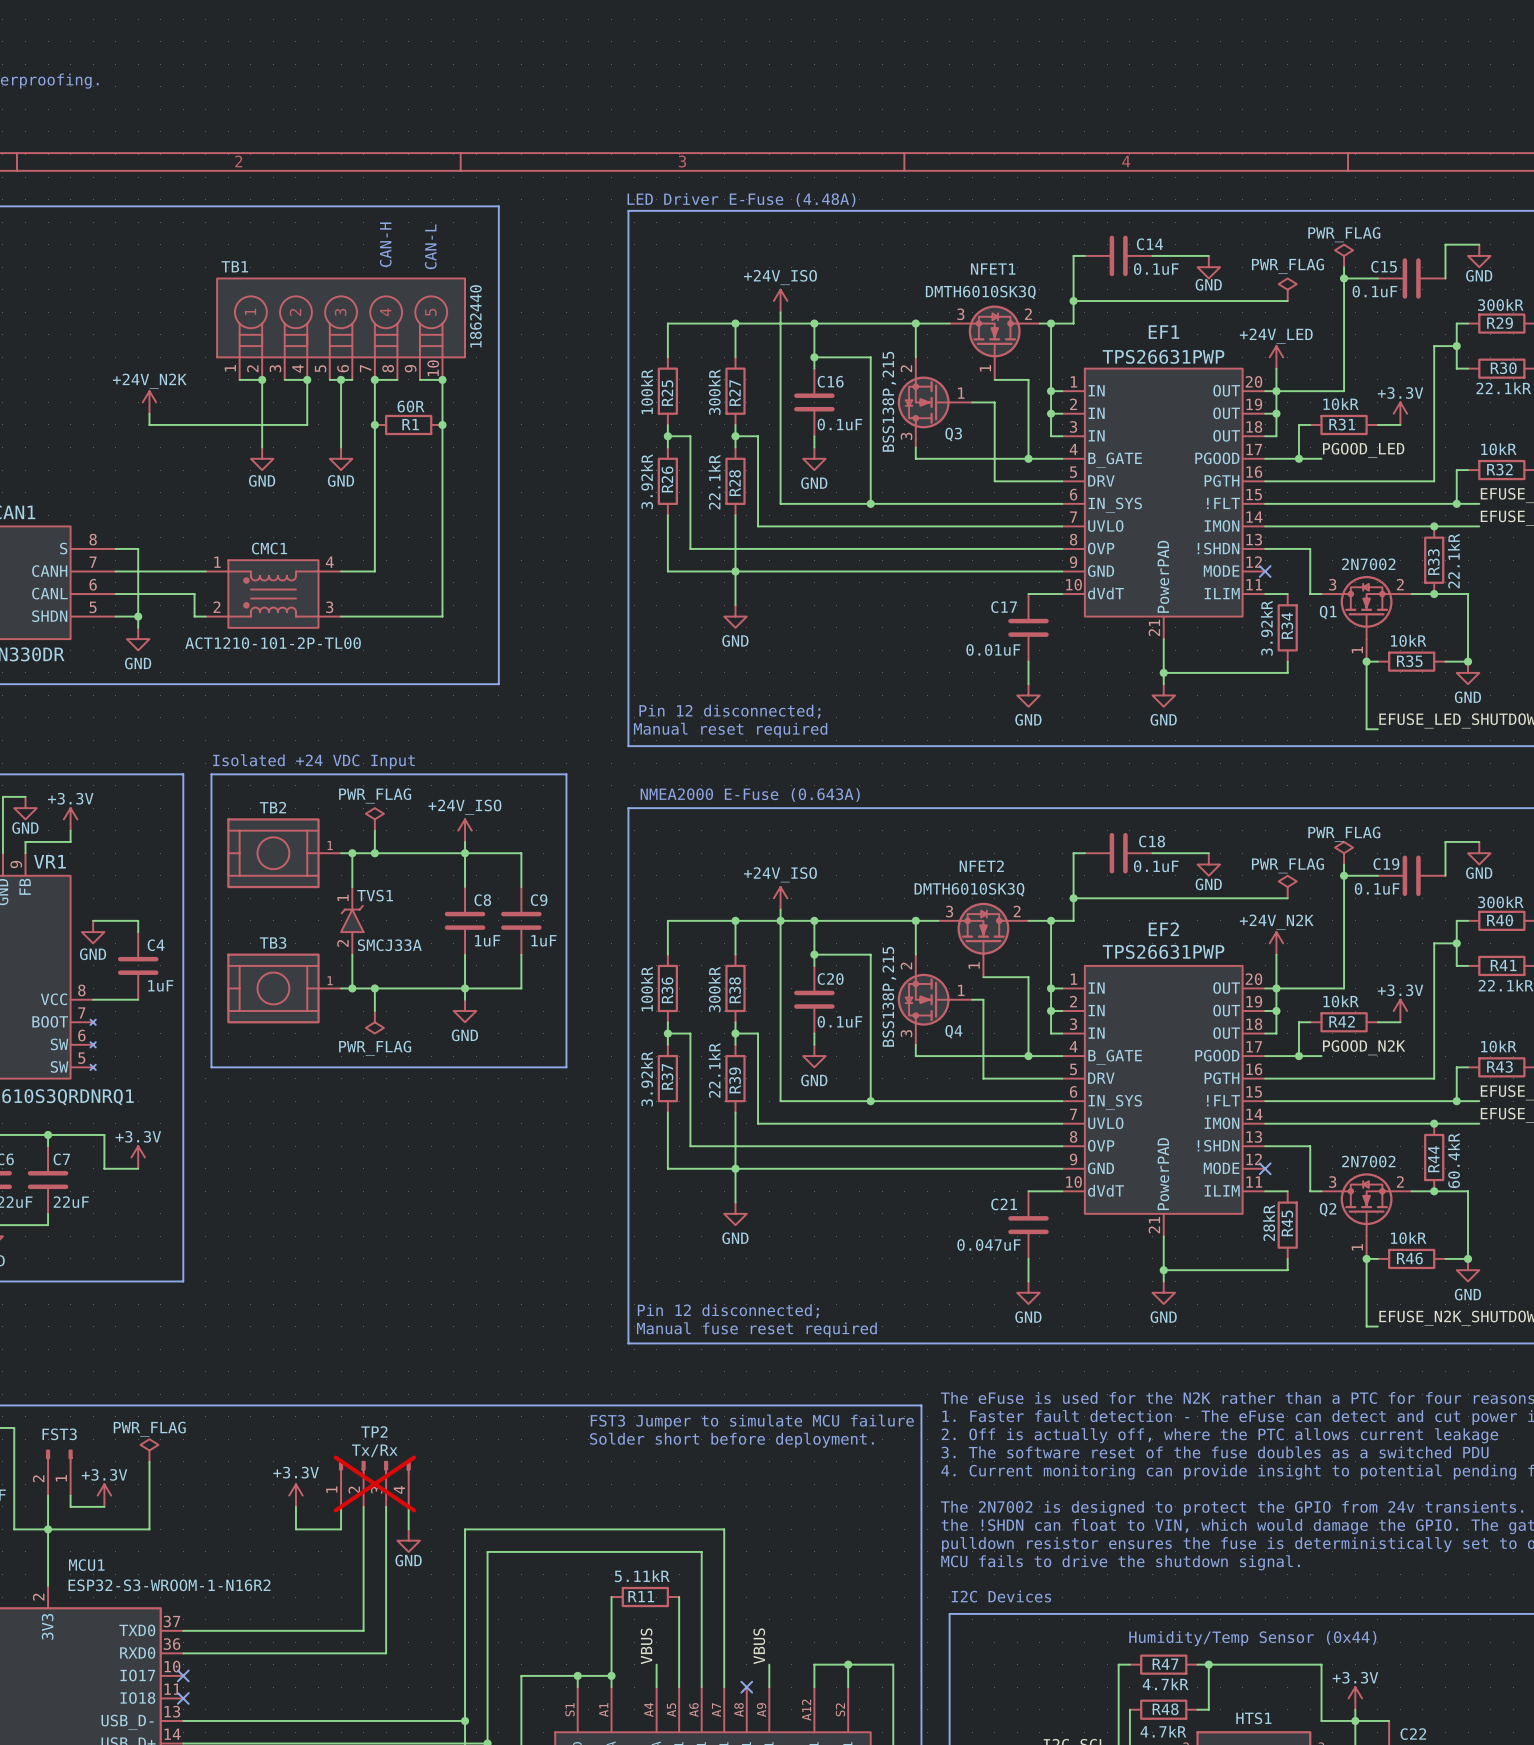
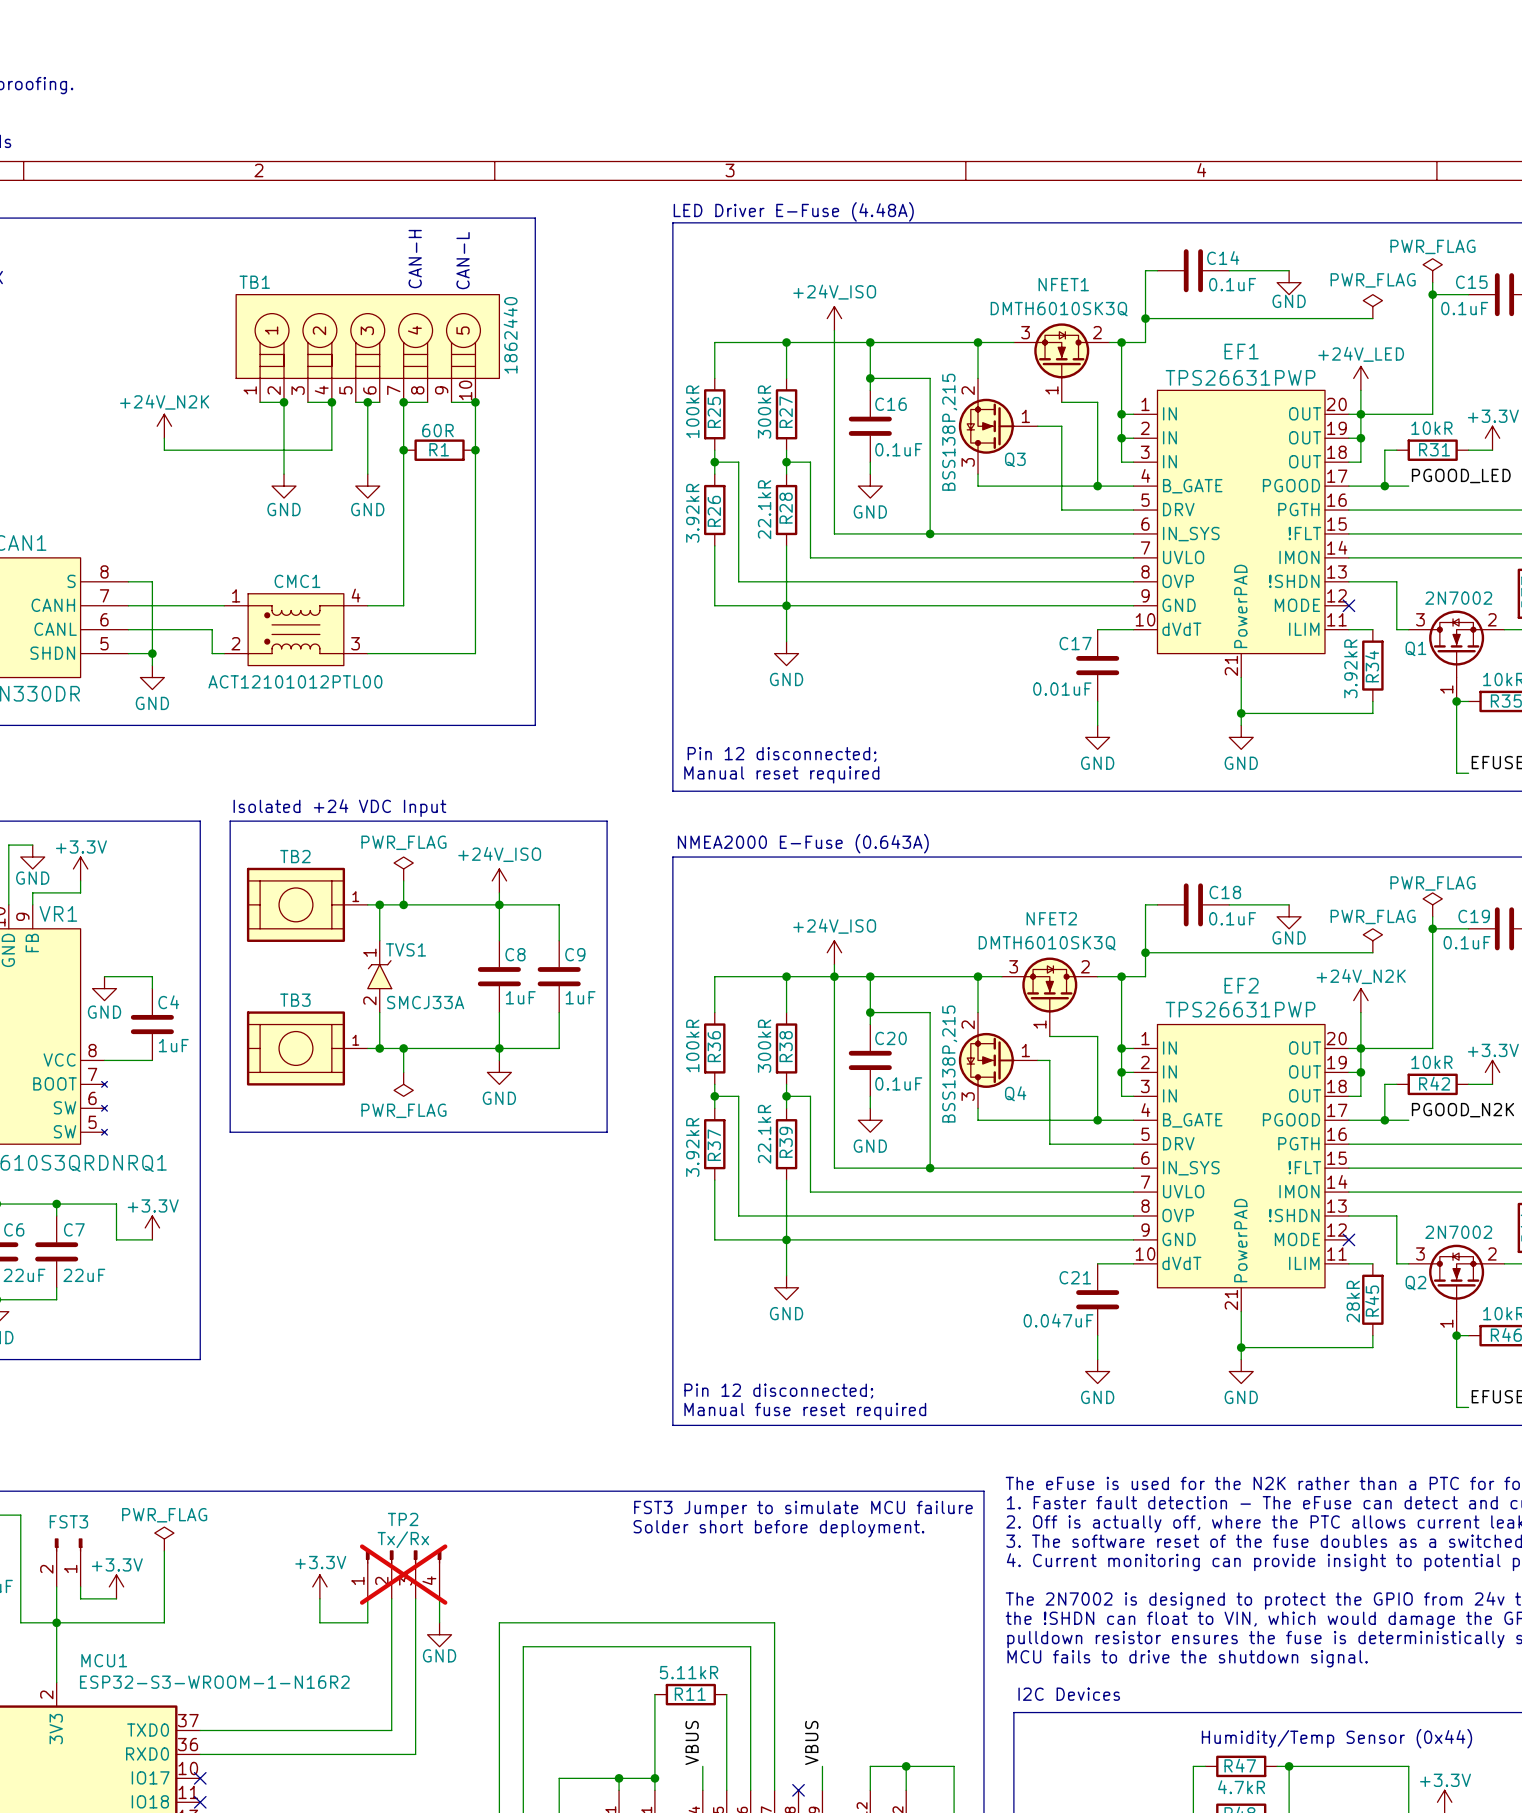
CMC1 value: ACT1210-101-2P-TL00 (273, 643) -> ACT12101012PTL00 (295, 681)

